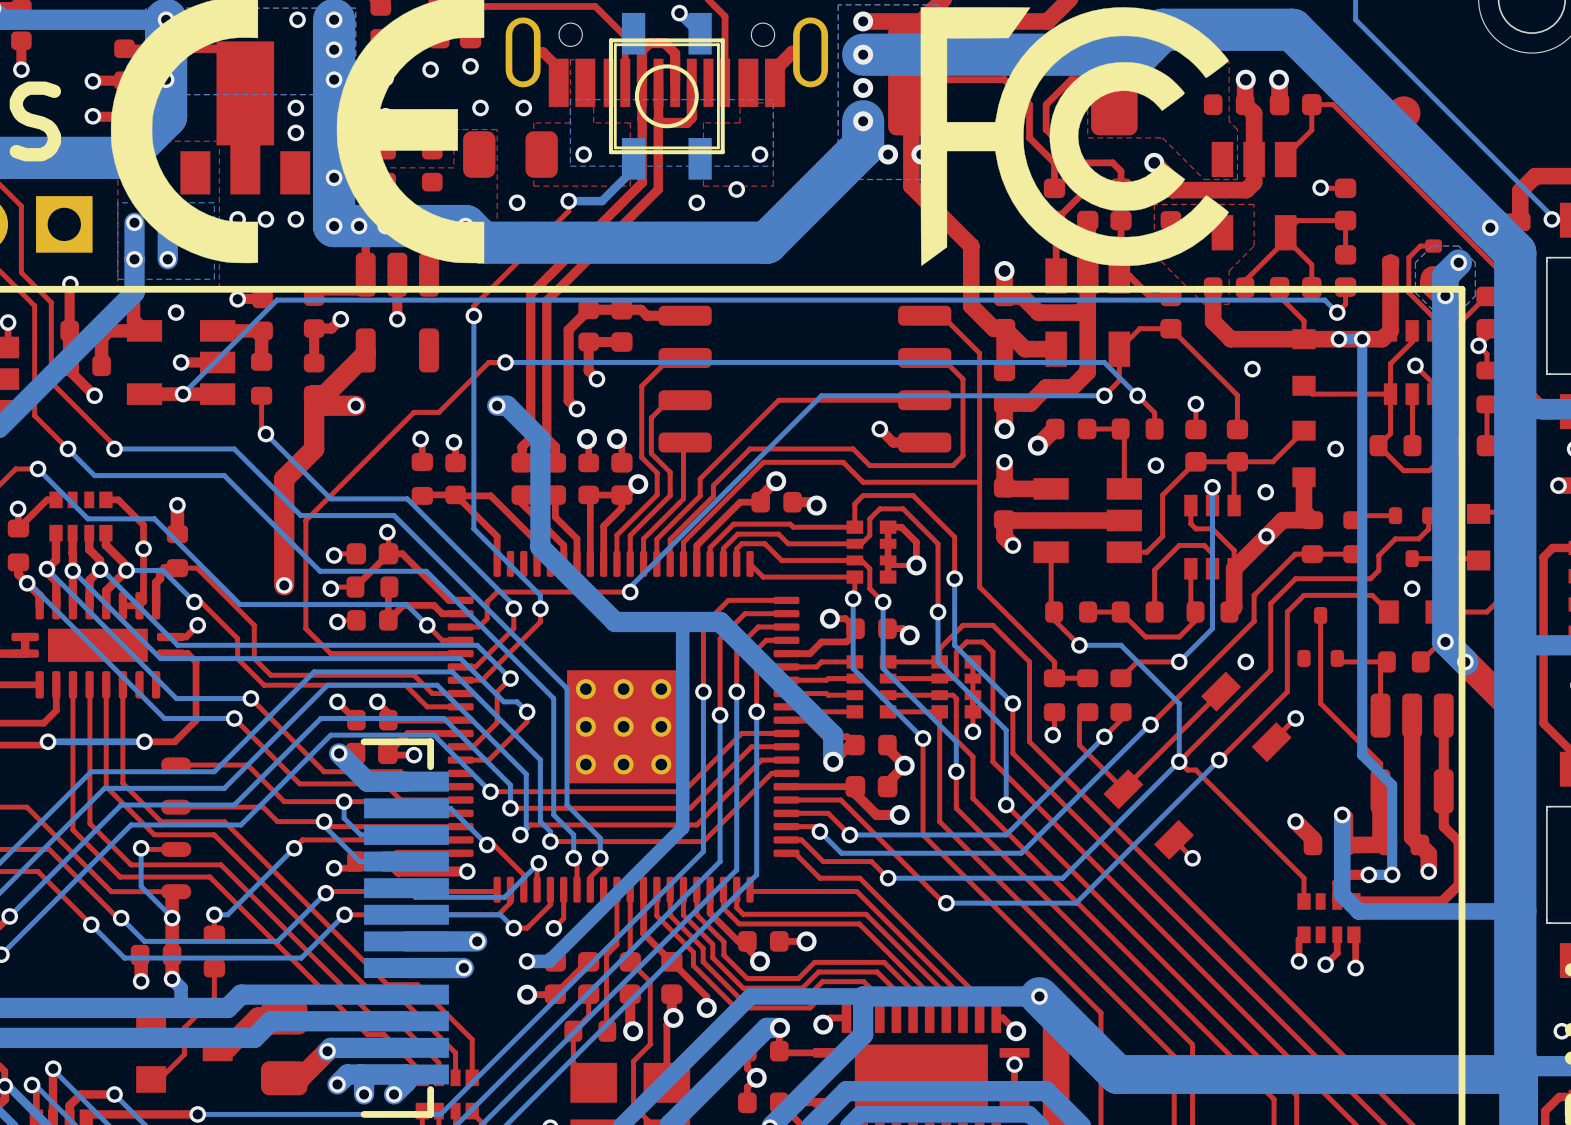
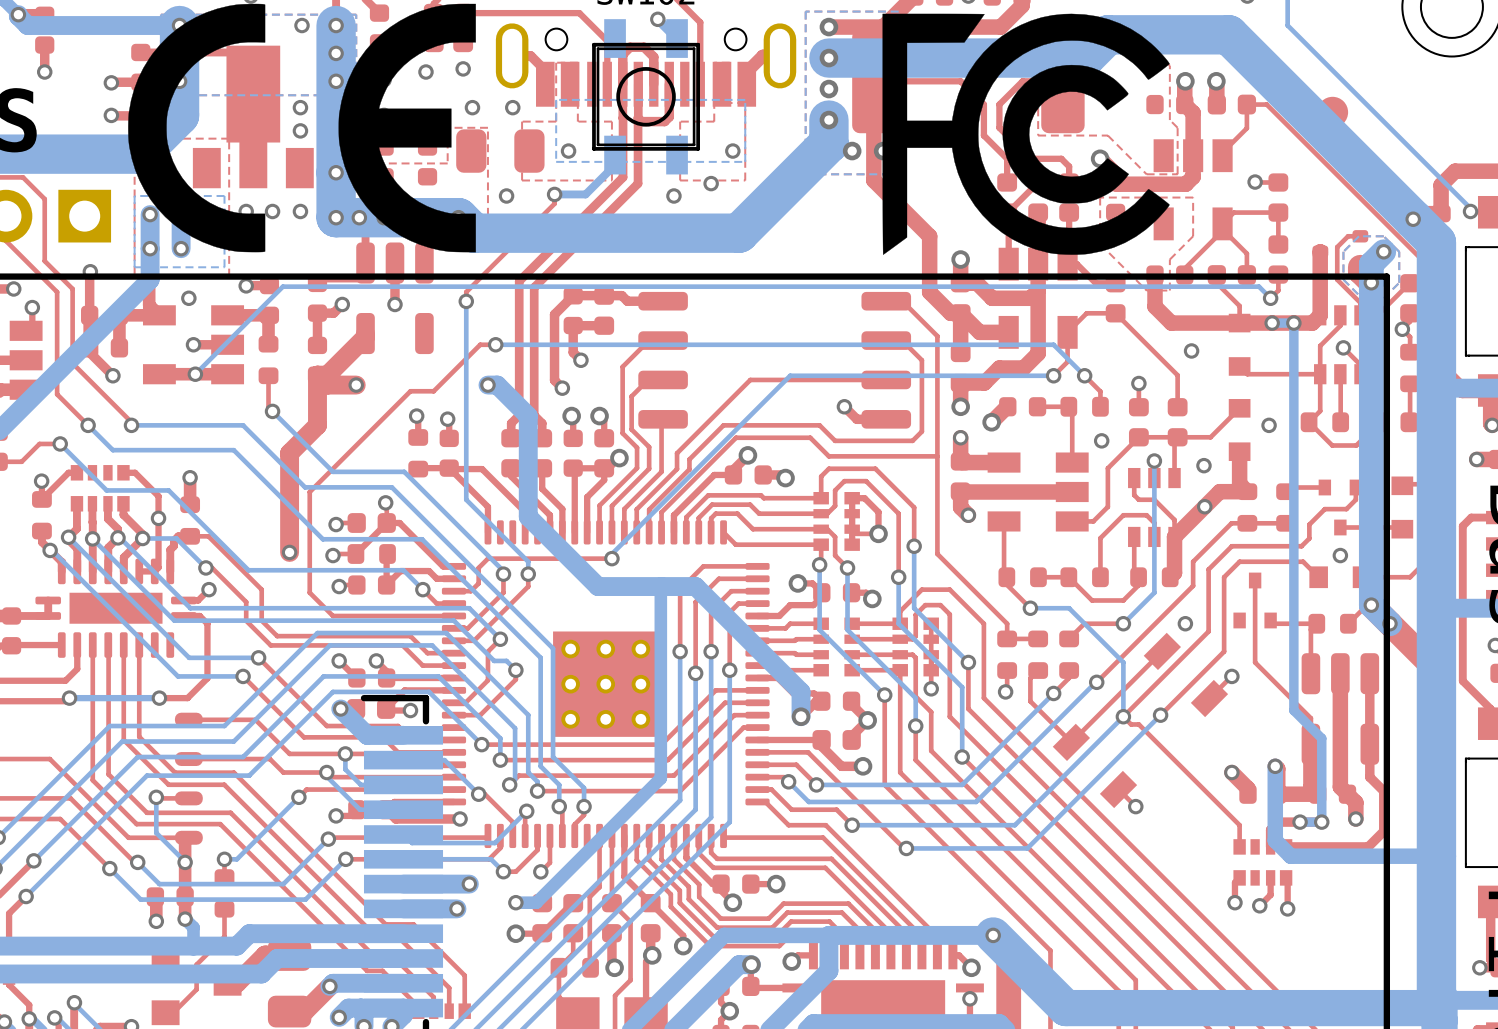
part footprint: [1388, 507, 1436, 568] -> [1318, 479, 1363, 536]
part footprint: [1297, 607, 1344, 667] -> [1233, 572, 1277, 629]

